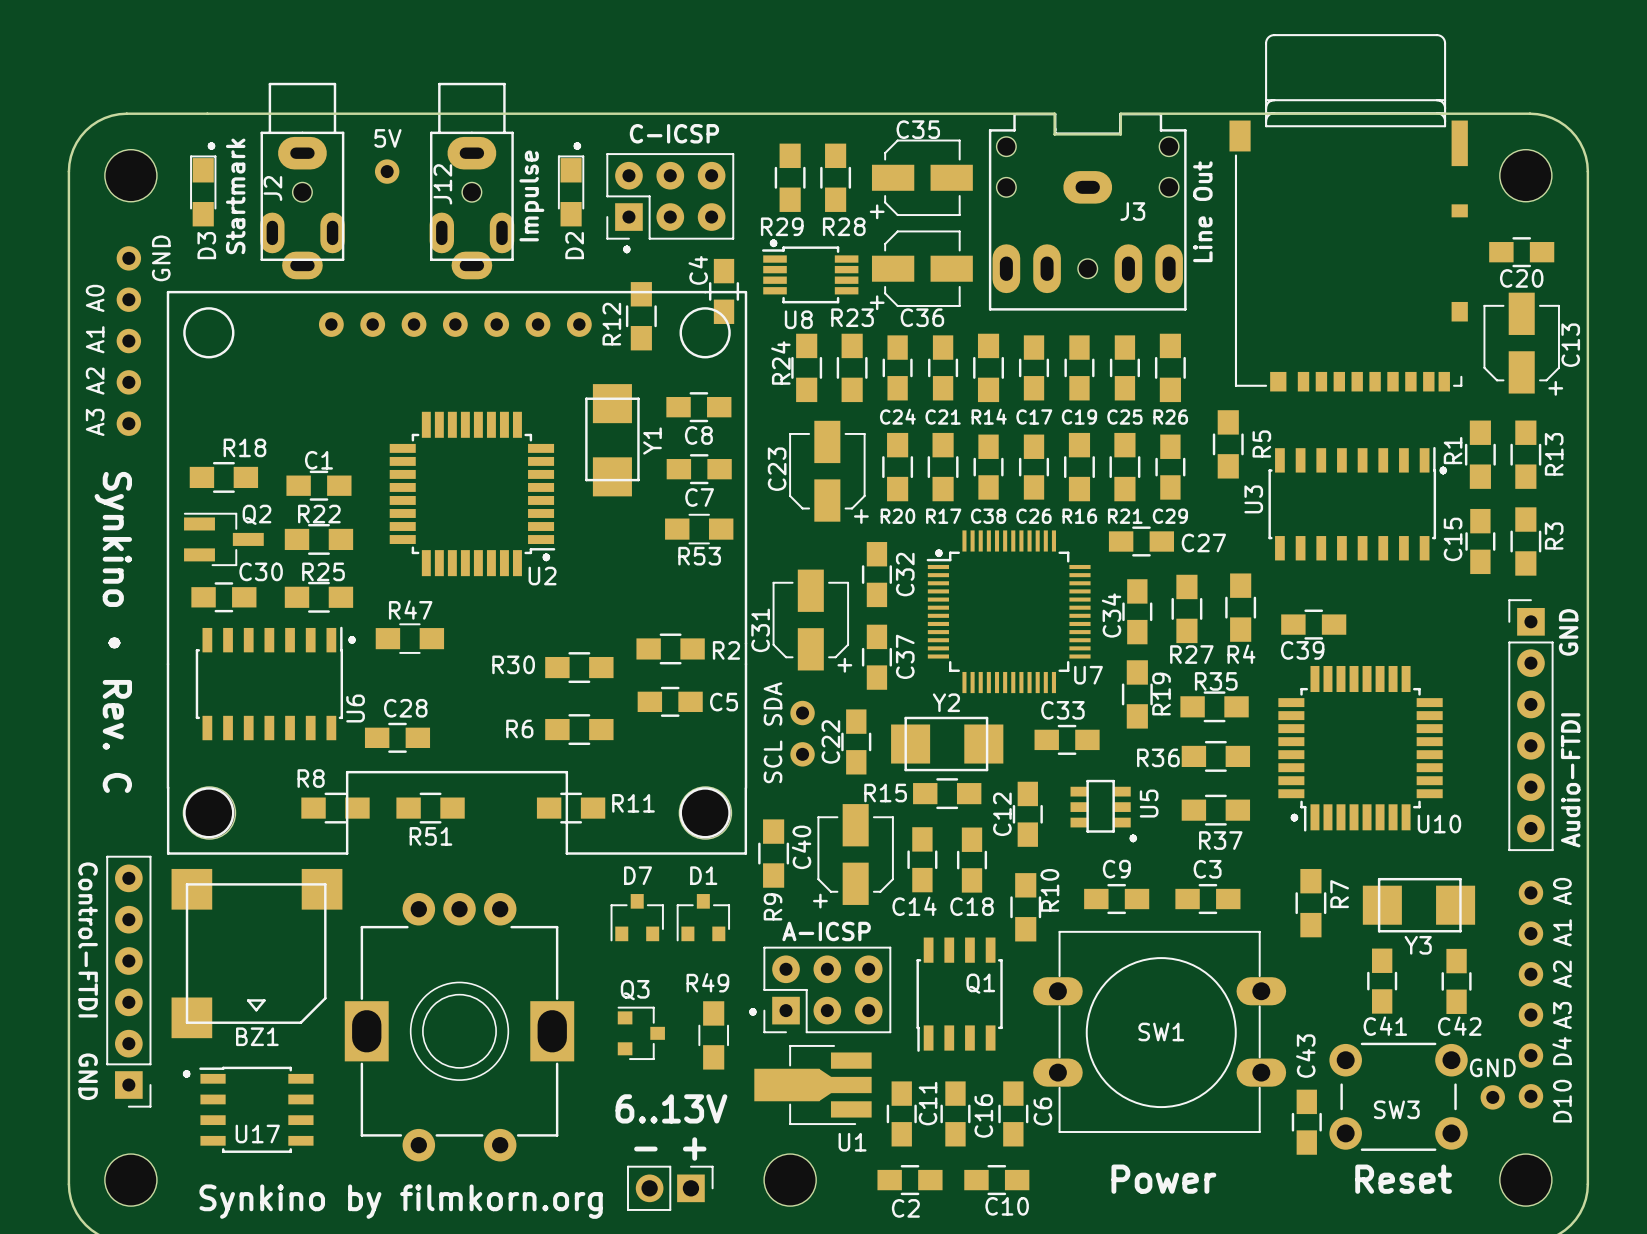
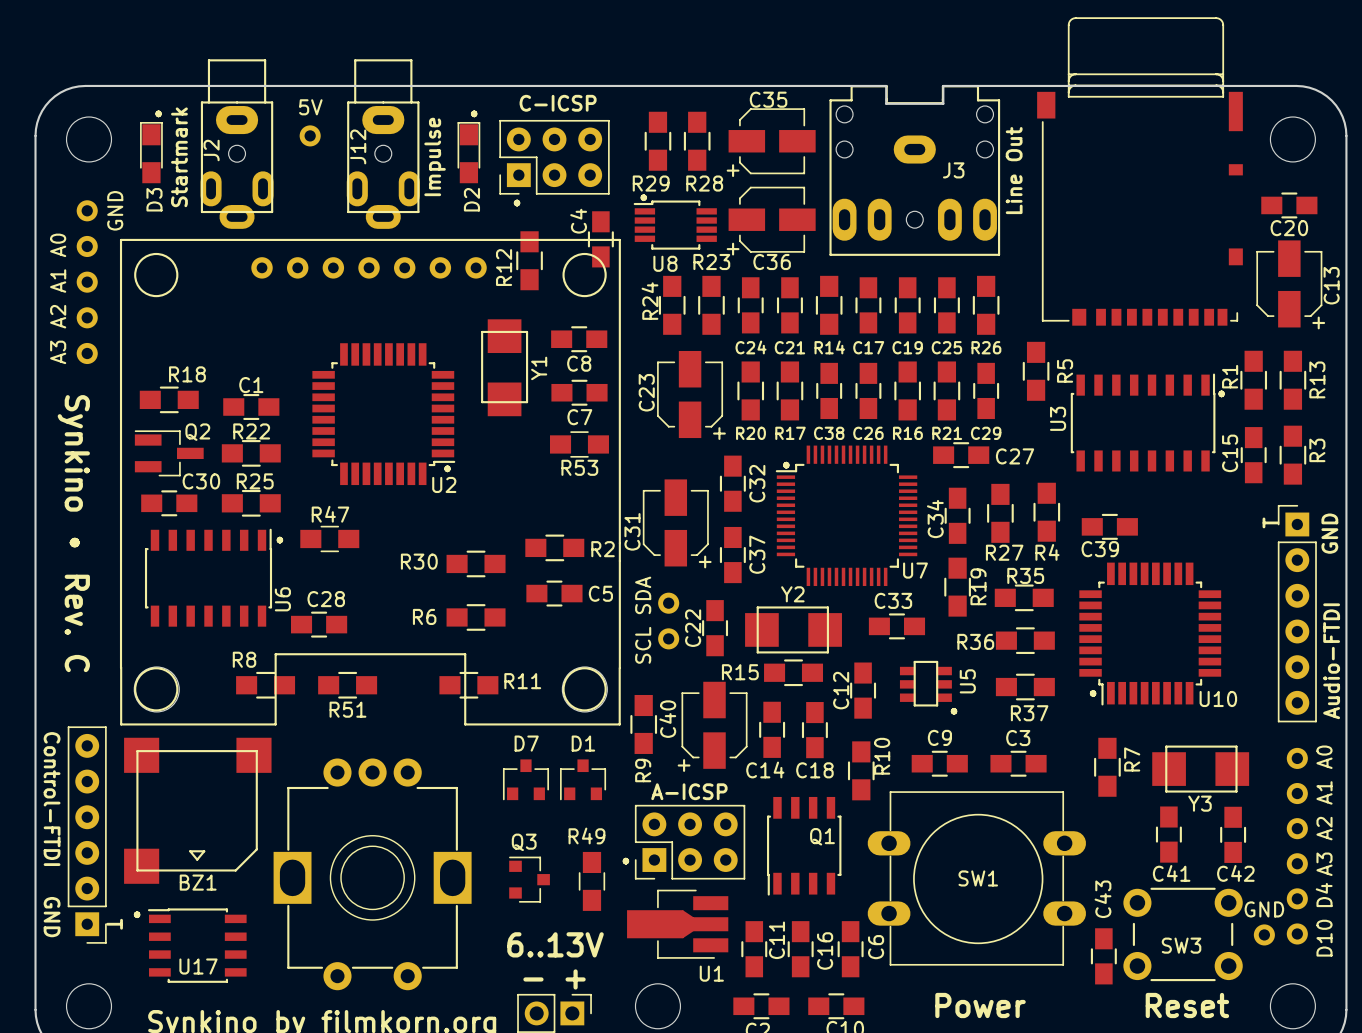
text: none -> T (1270, 522)
text: none -> T (114, 924)

